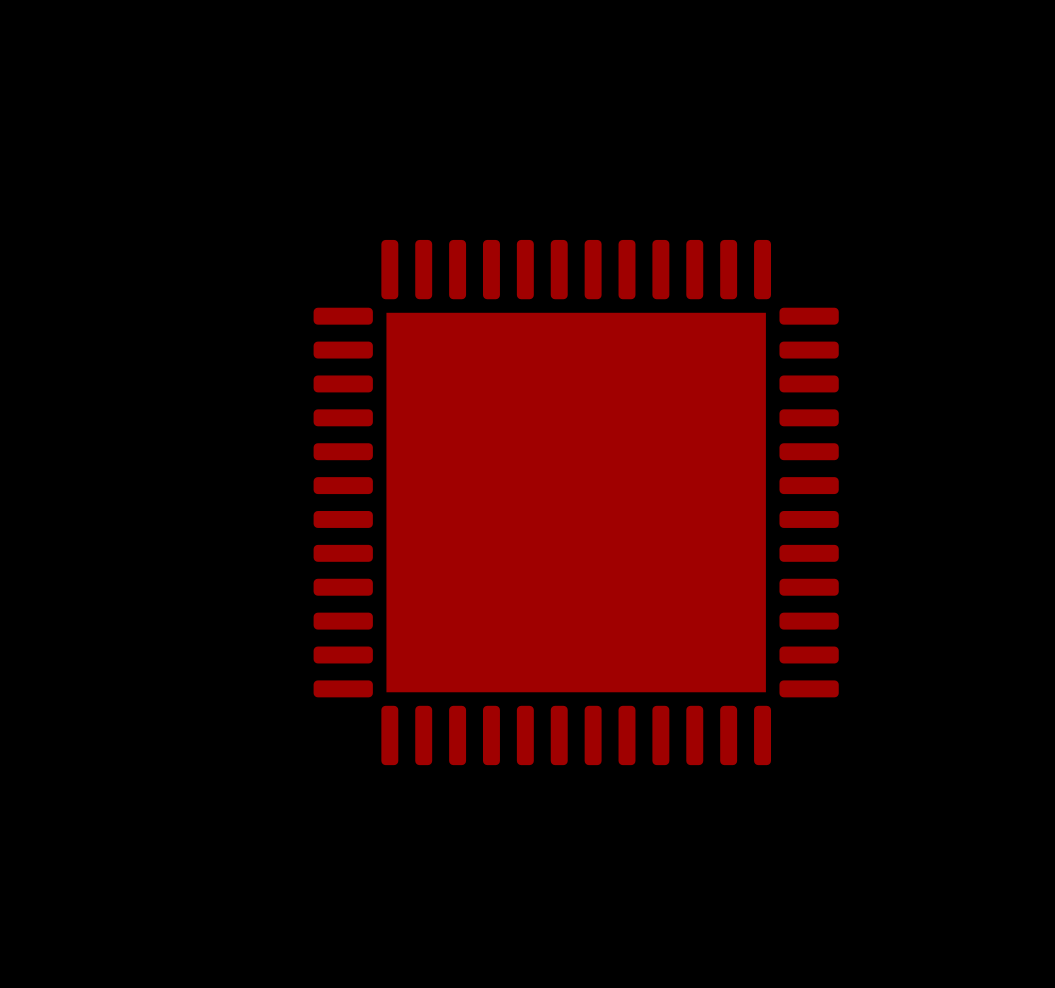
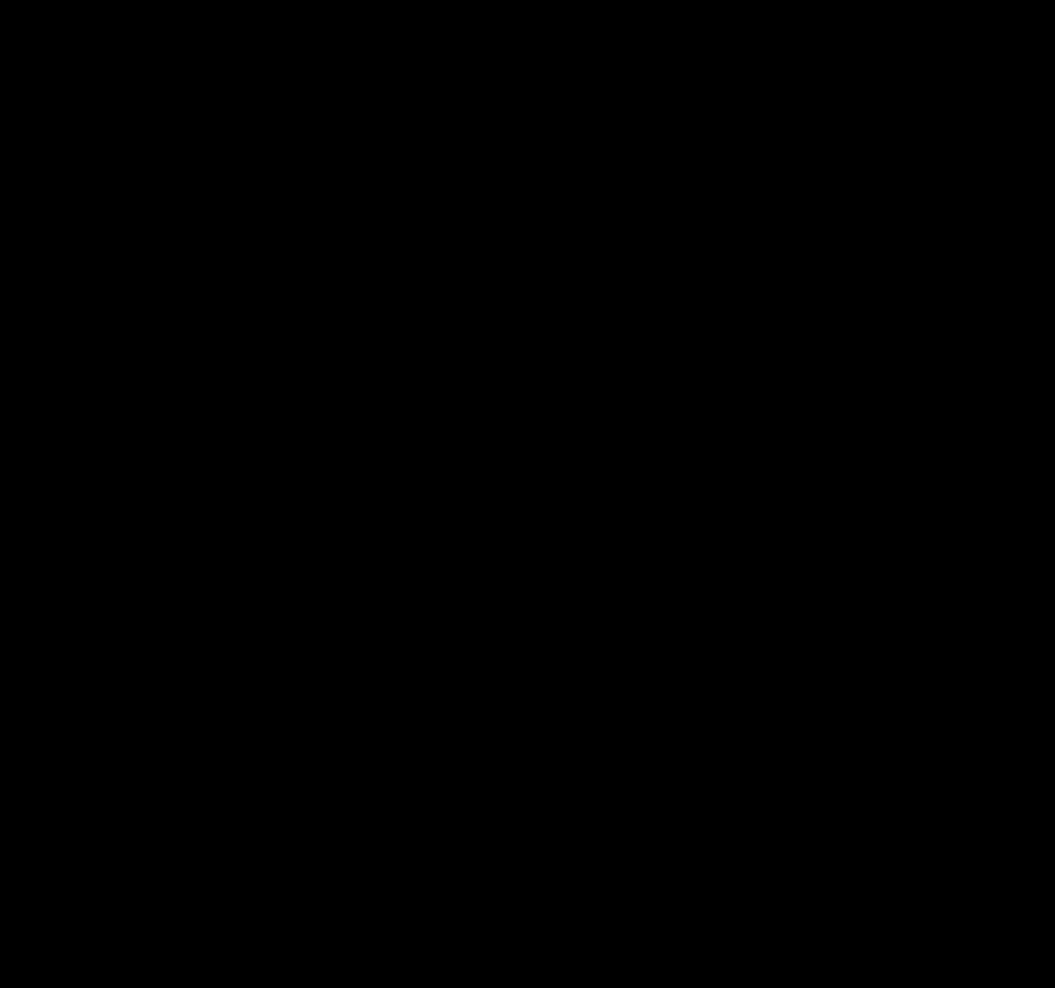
part: (576, 502) -> none

